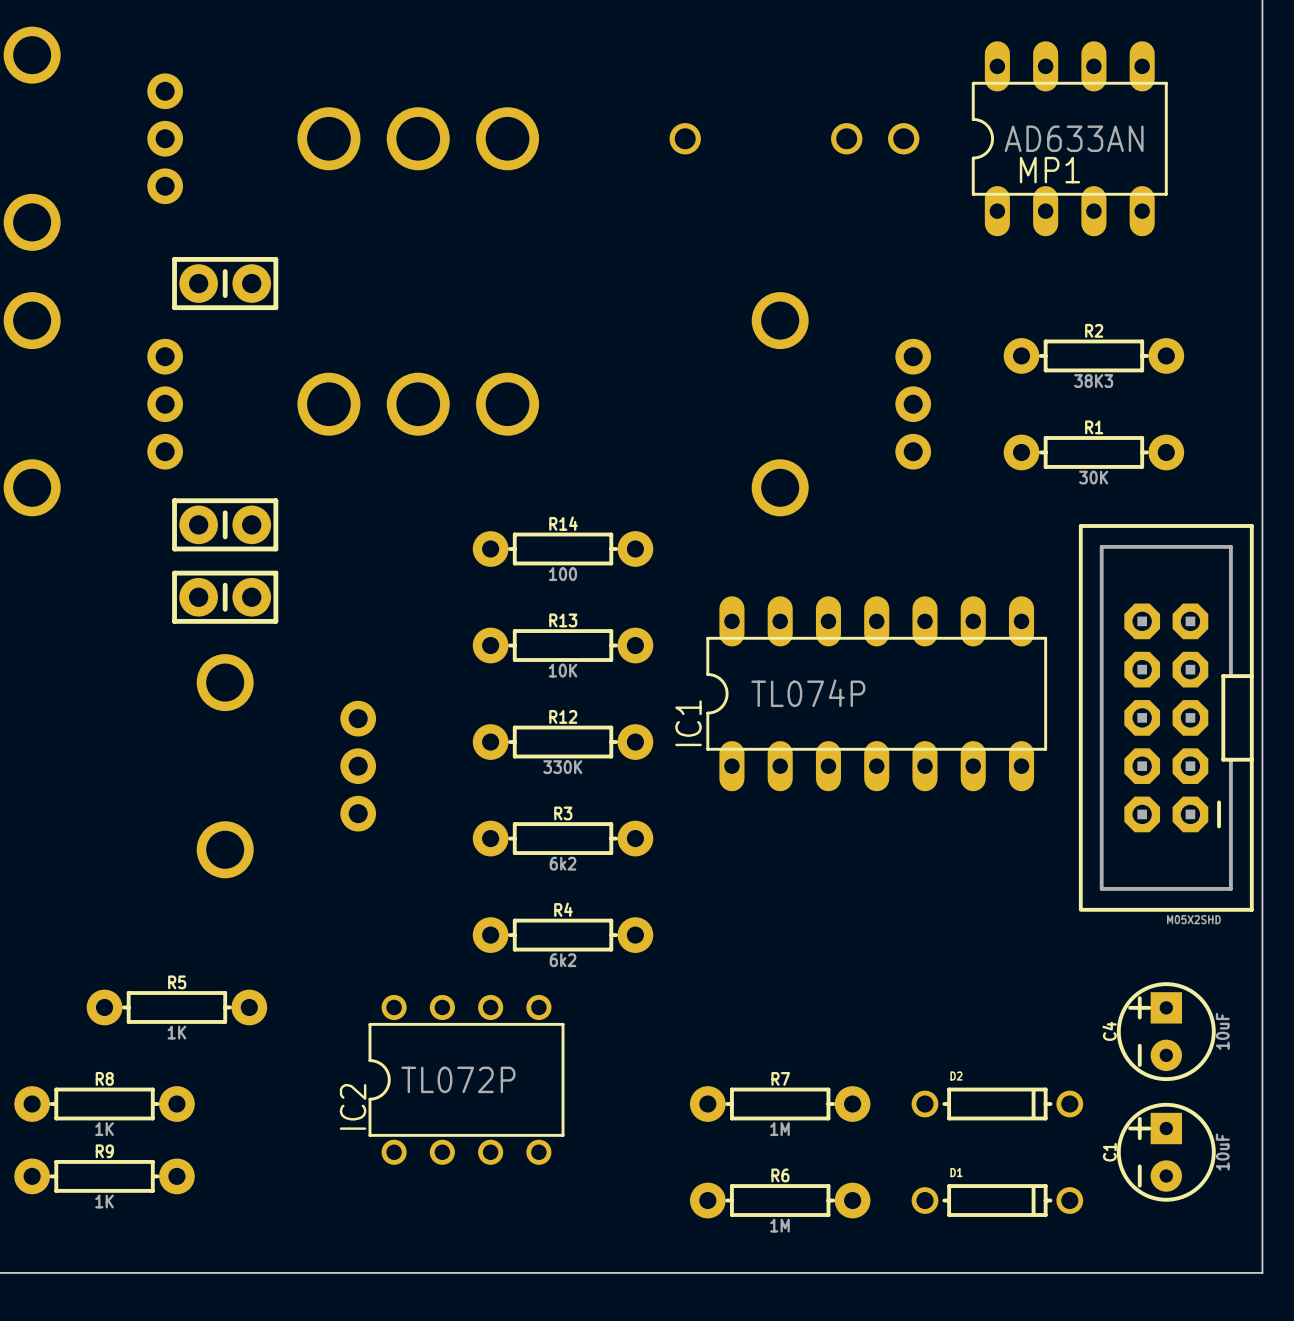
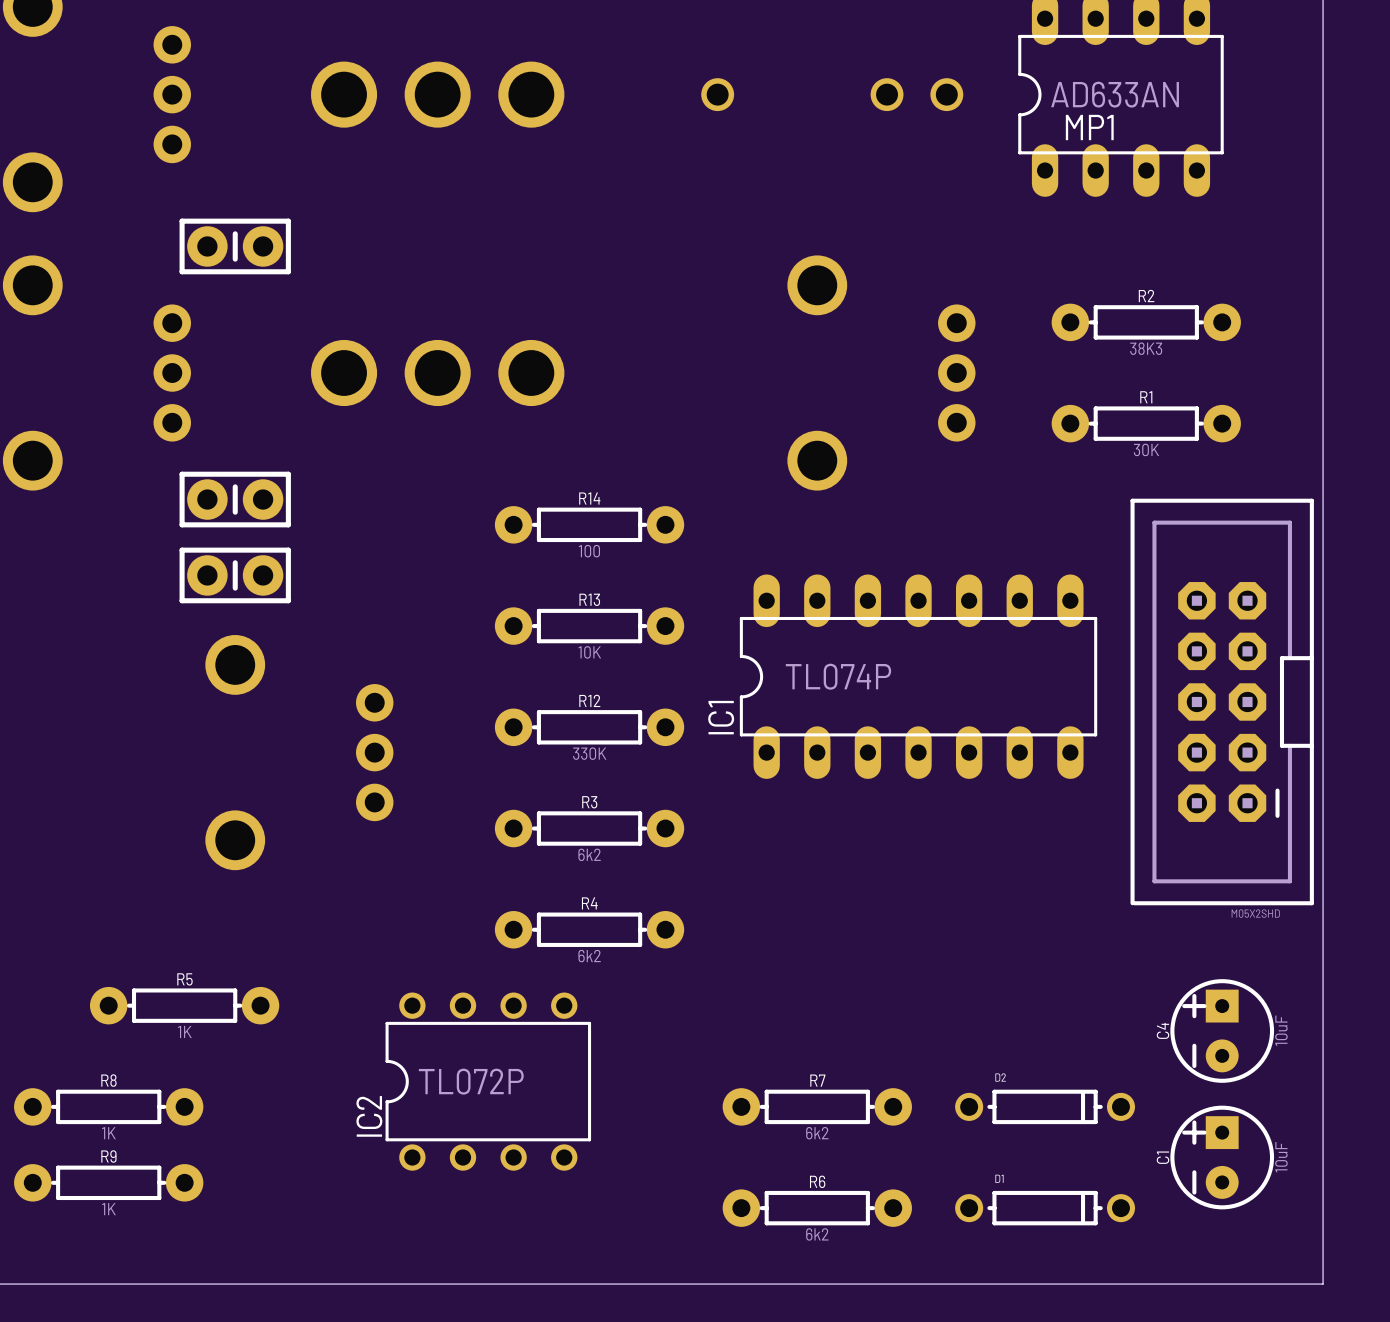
R7 value: 1M (779, 1129) -> 6k2 (817, 1133)
R6 value: 1M (779, 1225) -> 6k2 (817, 1234)

